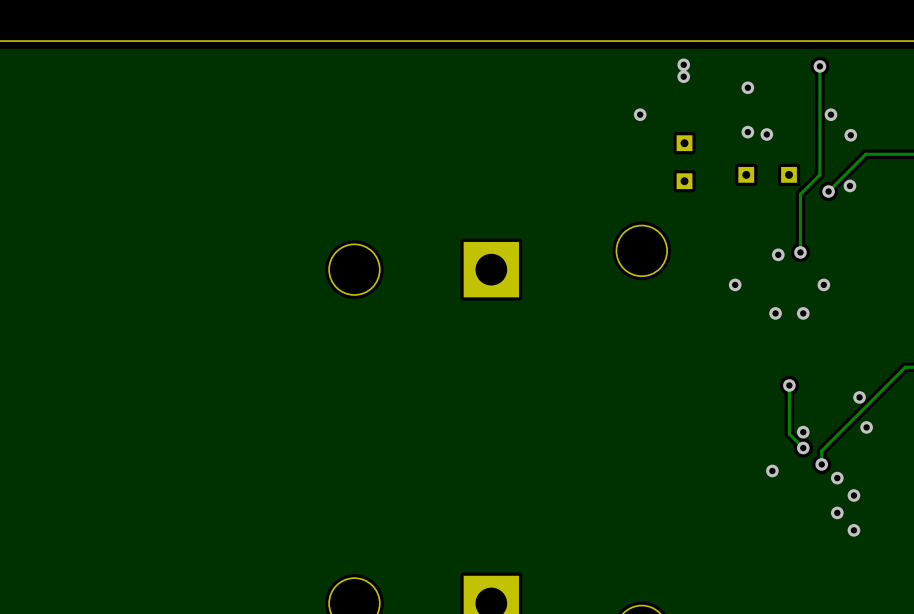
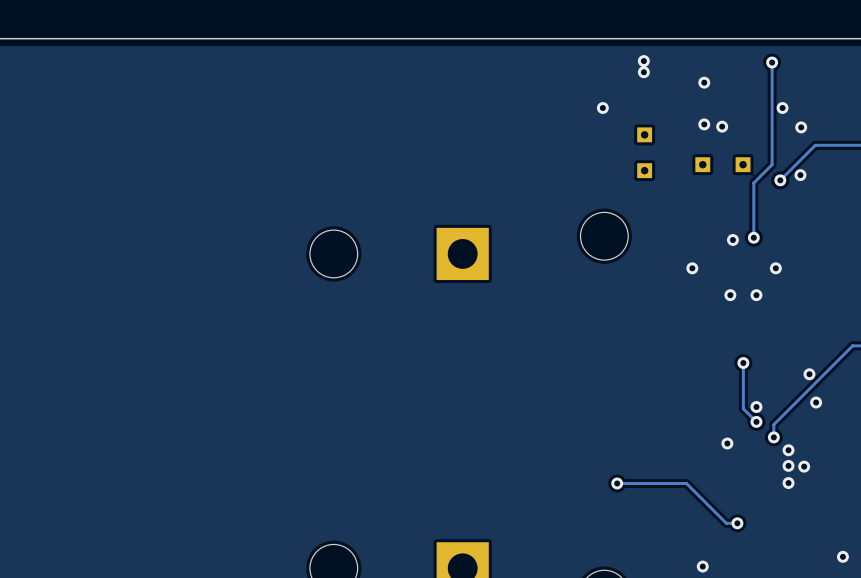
via: none -> (788, 465)
track: none -> (617, 483) (686, 483) (726, 523) (737, 523)
via: none -> (617, 483)
via: (853, 530) -> none
via: none -> (737, 523)
via: none -> (842, 556)
via: none -> (702, 566)

